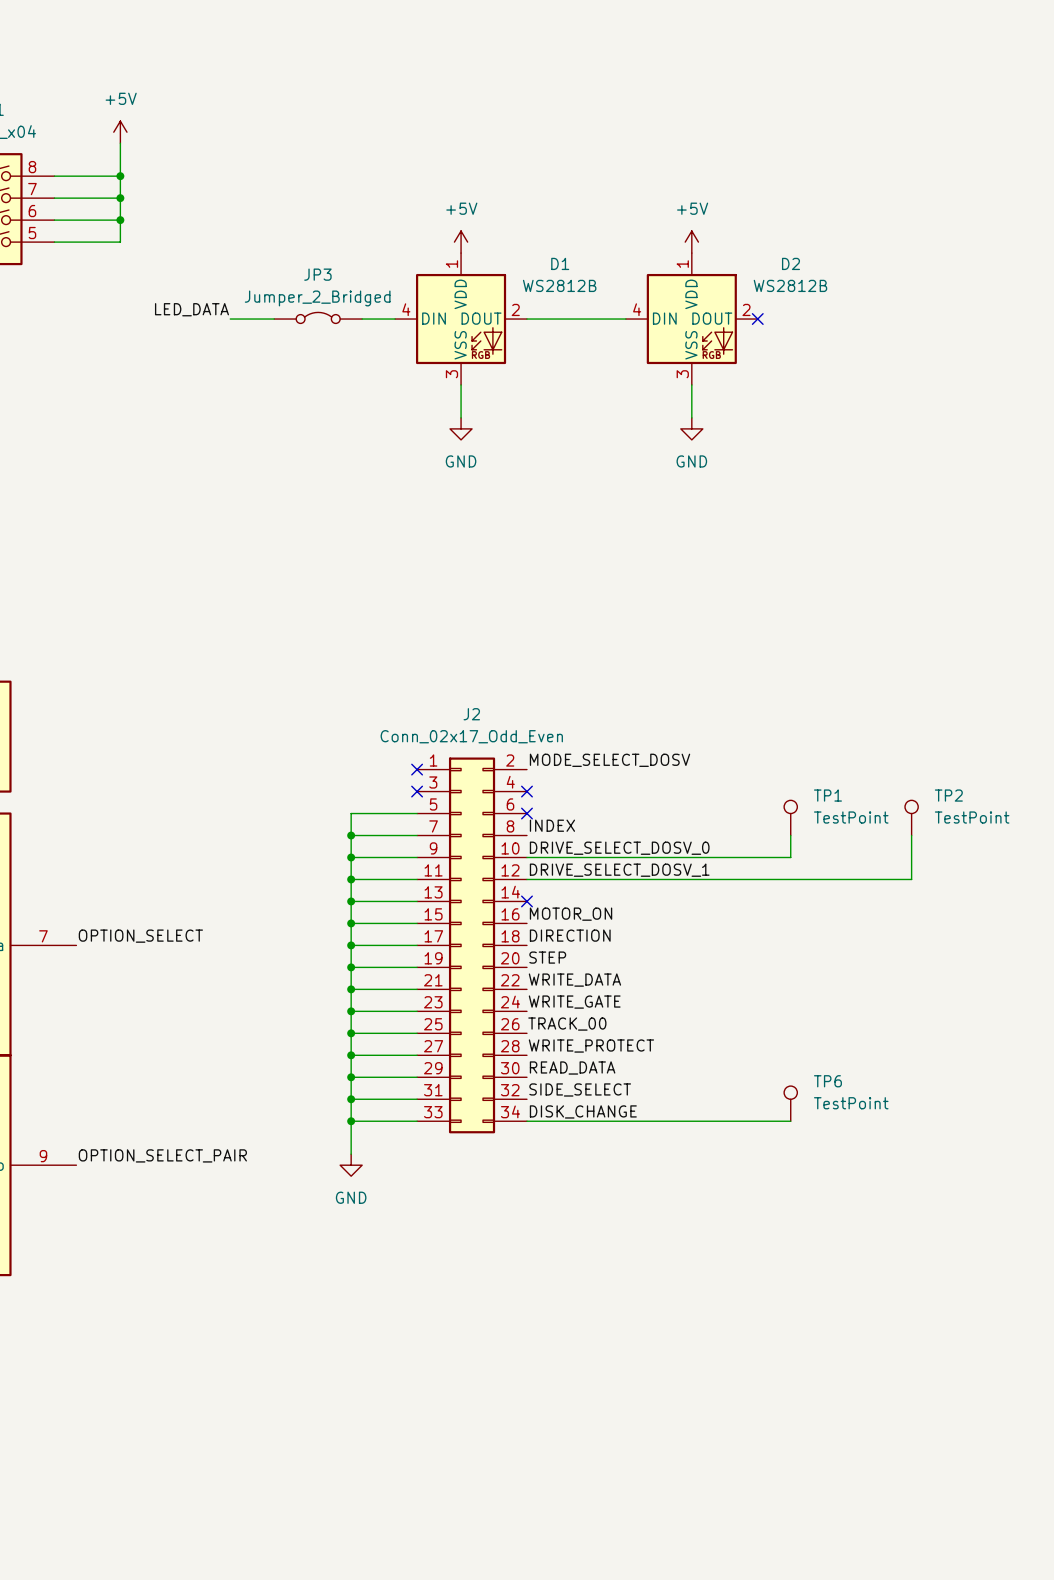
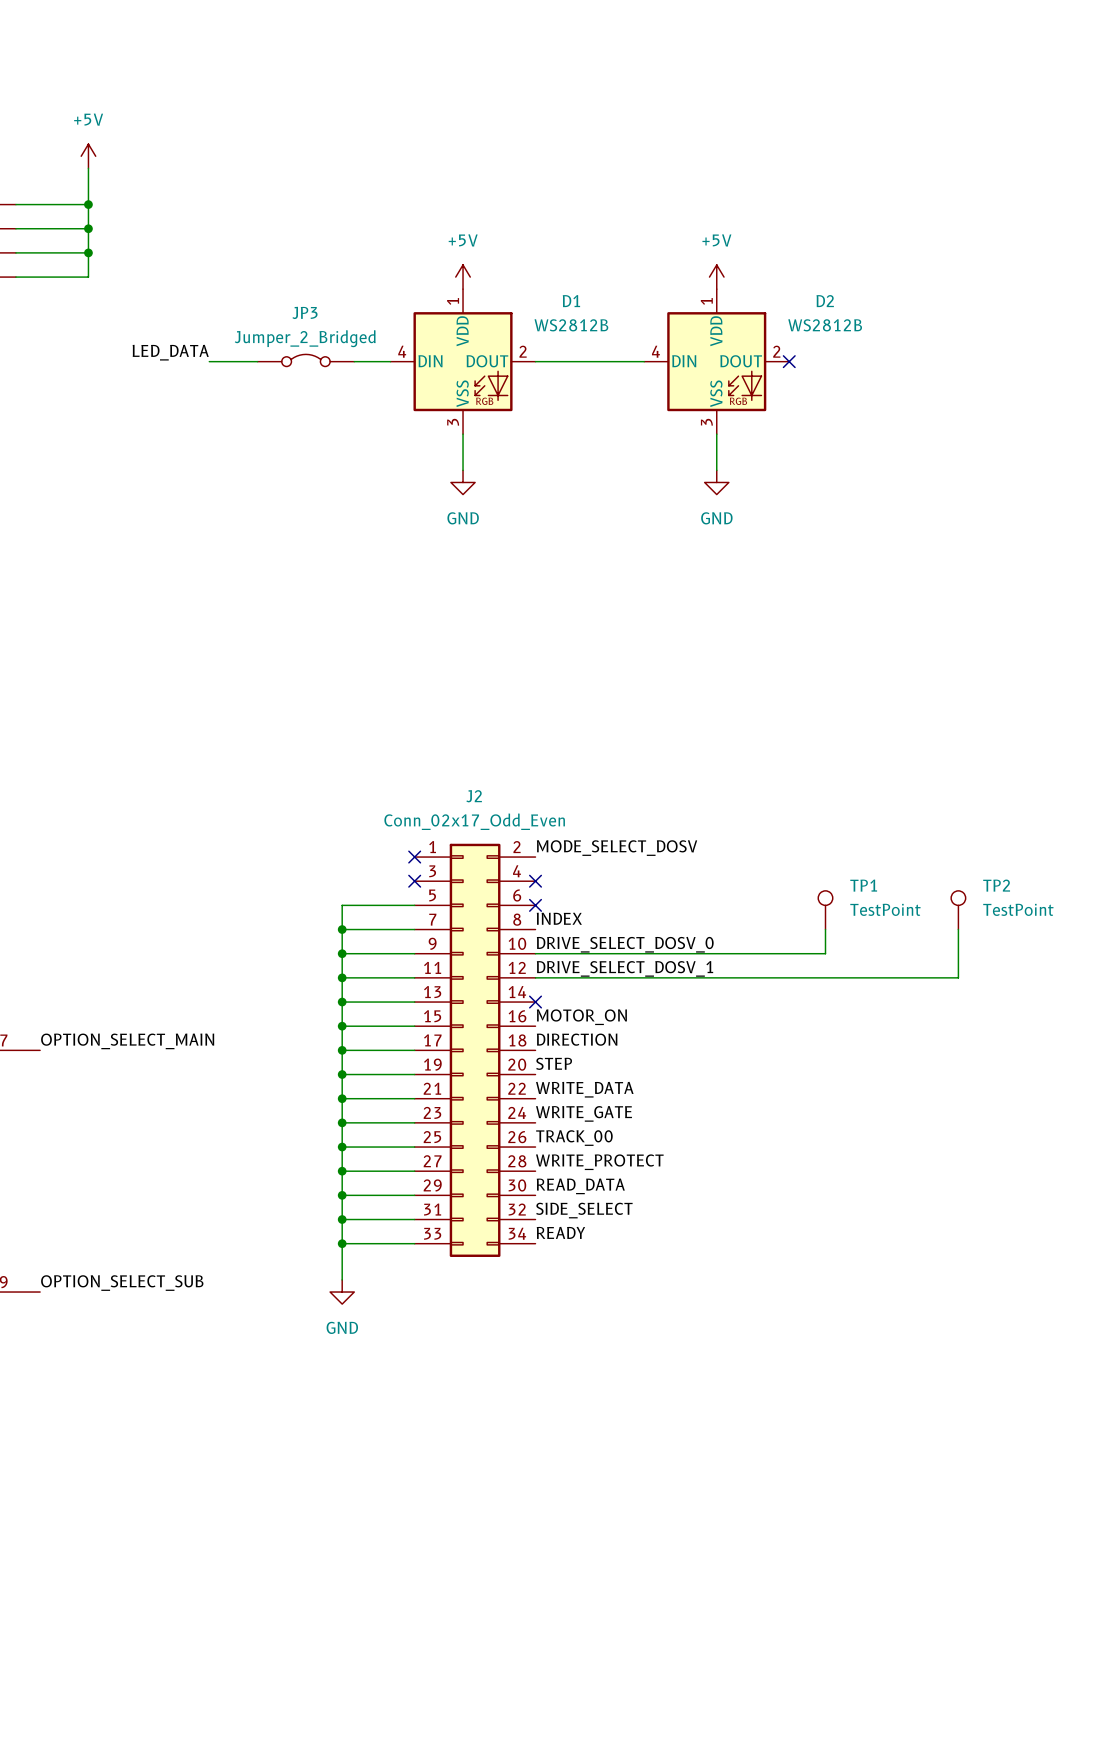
label: OPTION_SELECT (140, 936) -> OPTION_SELECT_MAIN (127, 1041)
TP6: TestPoint (790, 1103) -> none
label: DISK_CHANGE (583, 1111) -> READY (560, 1232)
wire: (526, 1121) (790, 1121) -> none
label: OPTION_SELECT_PAIR (162, 1155) -> OPTION_SELECT_SUB (122, 1283)

